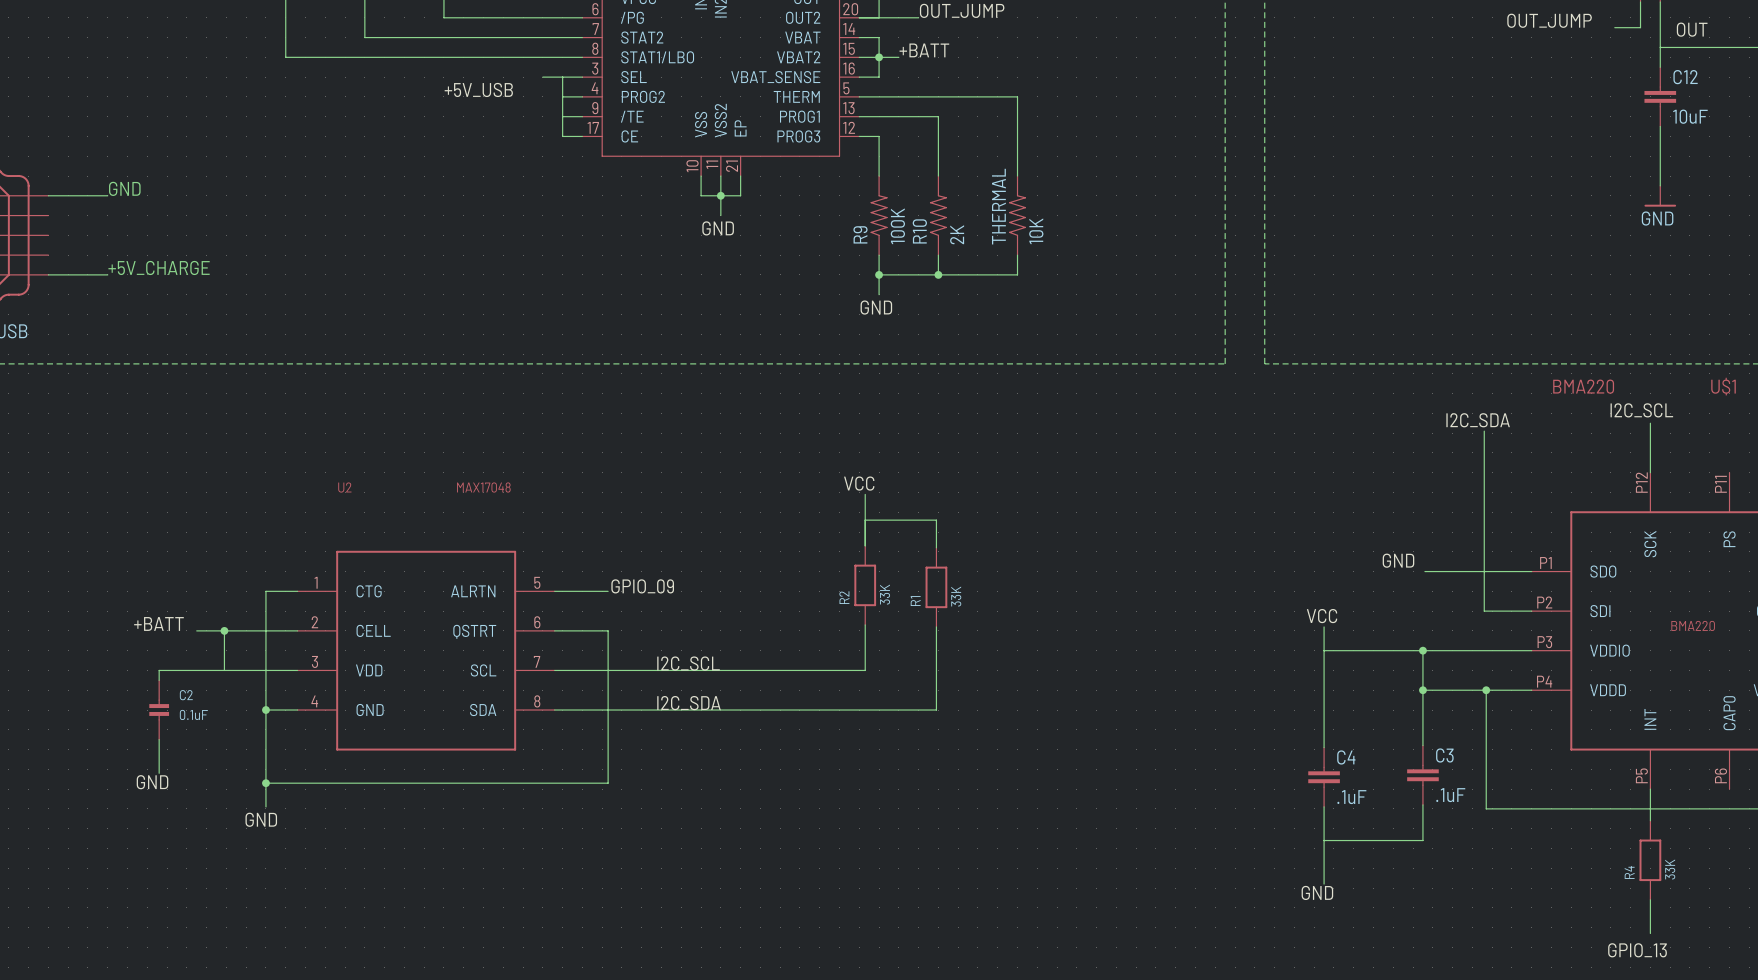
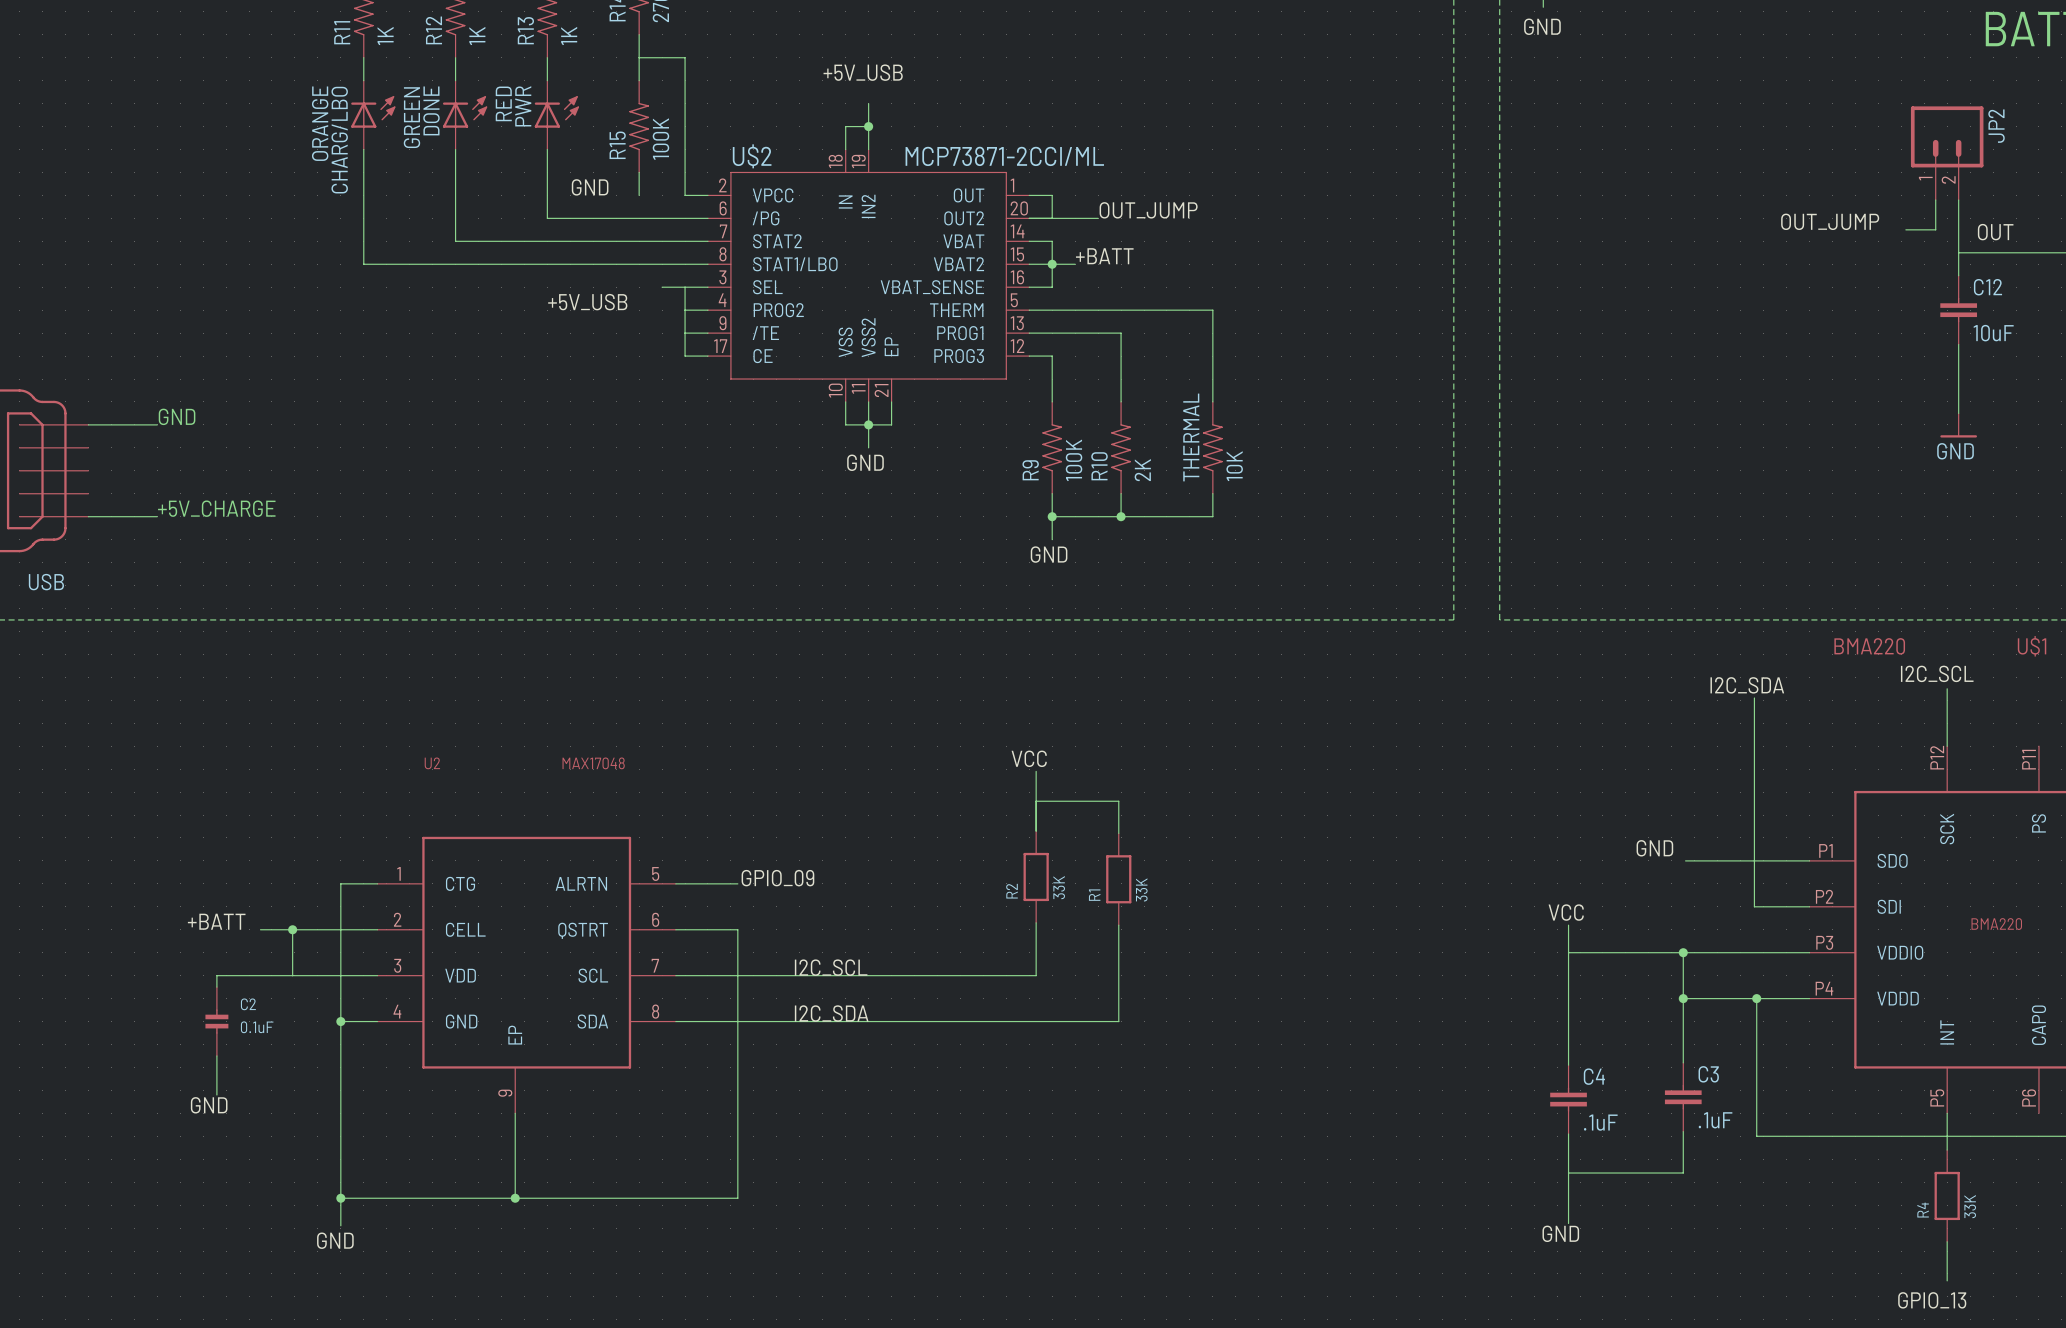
U2 symbol: [297, 550, 555, 751] -> [377, 836, 676, 1114]
wire: (265, 783) (608, 783) -> (340, 1198) (737, 1198) (737, 1106)
junction: (265, 783) -> none
wire: none -> (515, 1113) (515, 1198)
wire: none -> (340, 1133) (340, 1225)
label position: GND (261, 819) -> GND (335, 1240)
junction: none -> (340, 1198)
junction: none -> (515, 1198)

